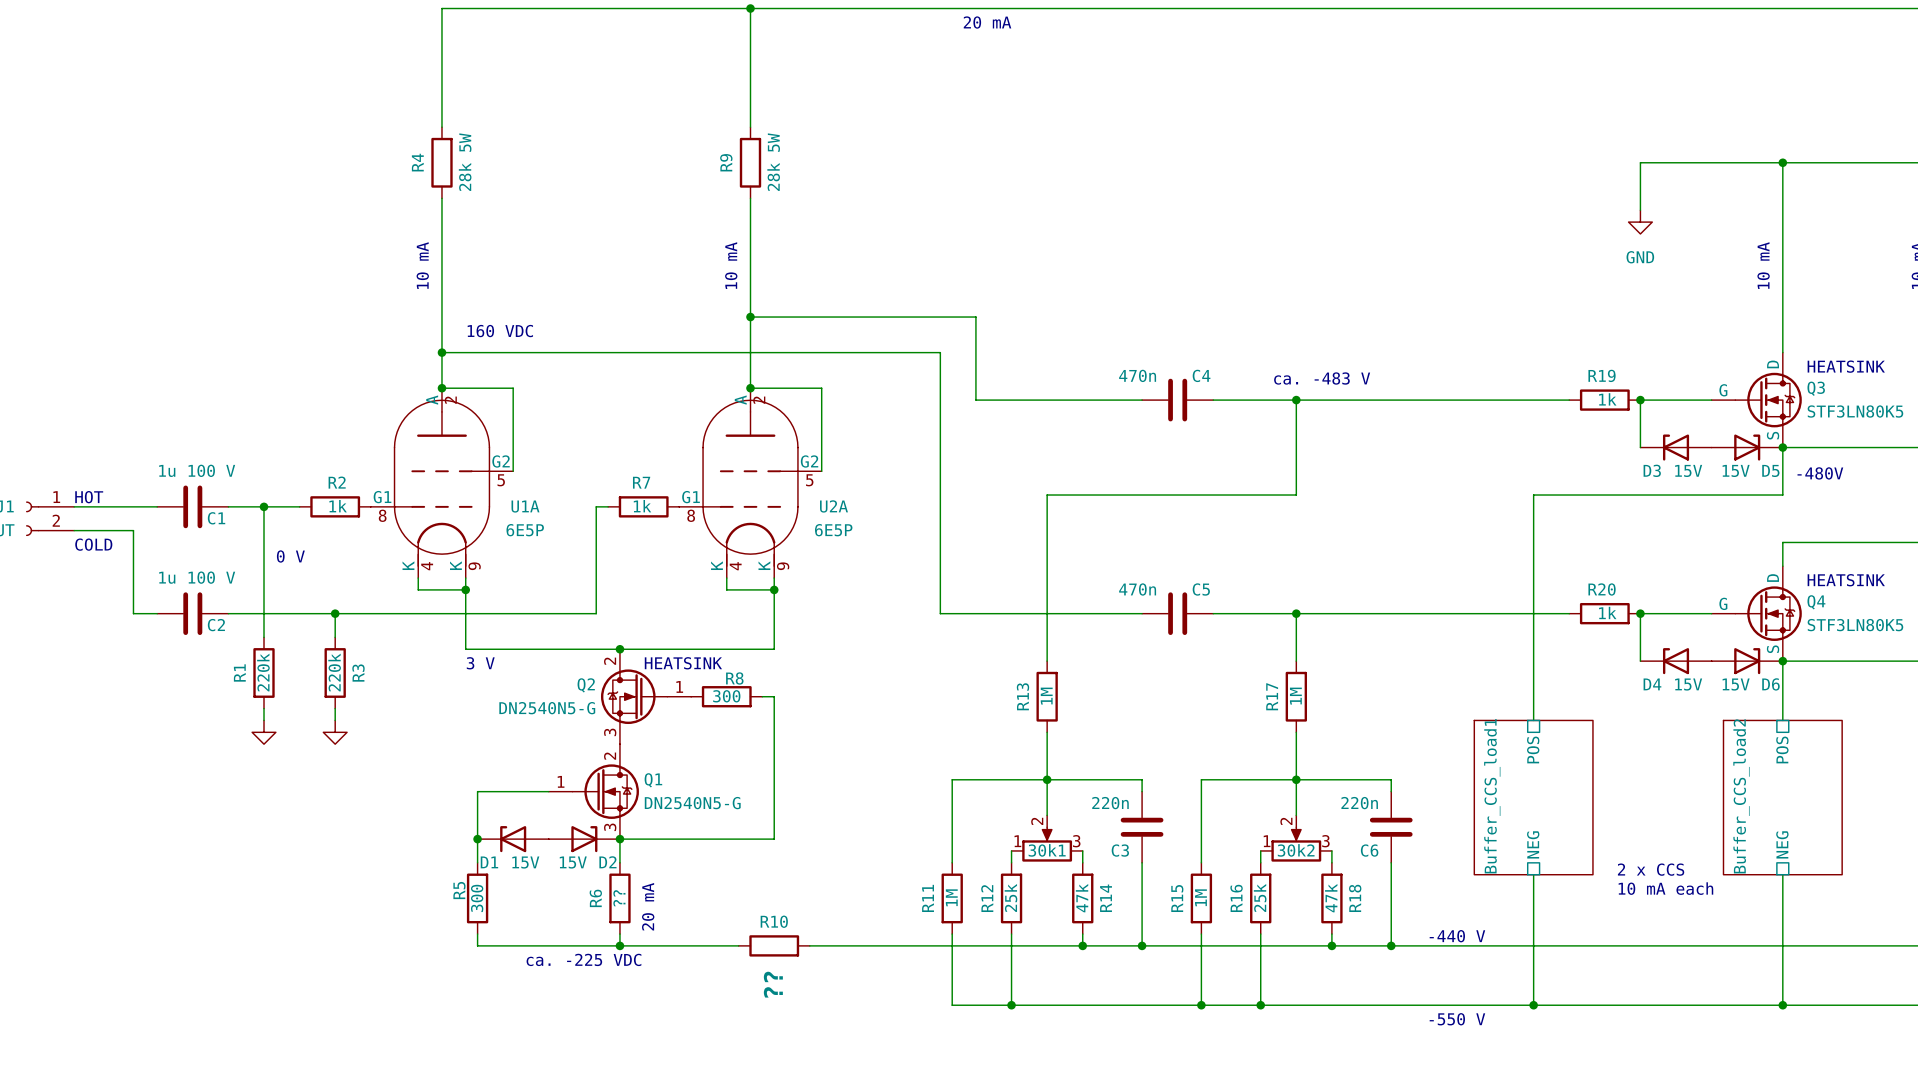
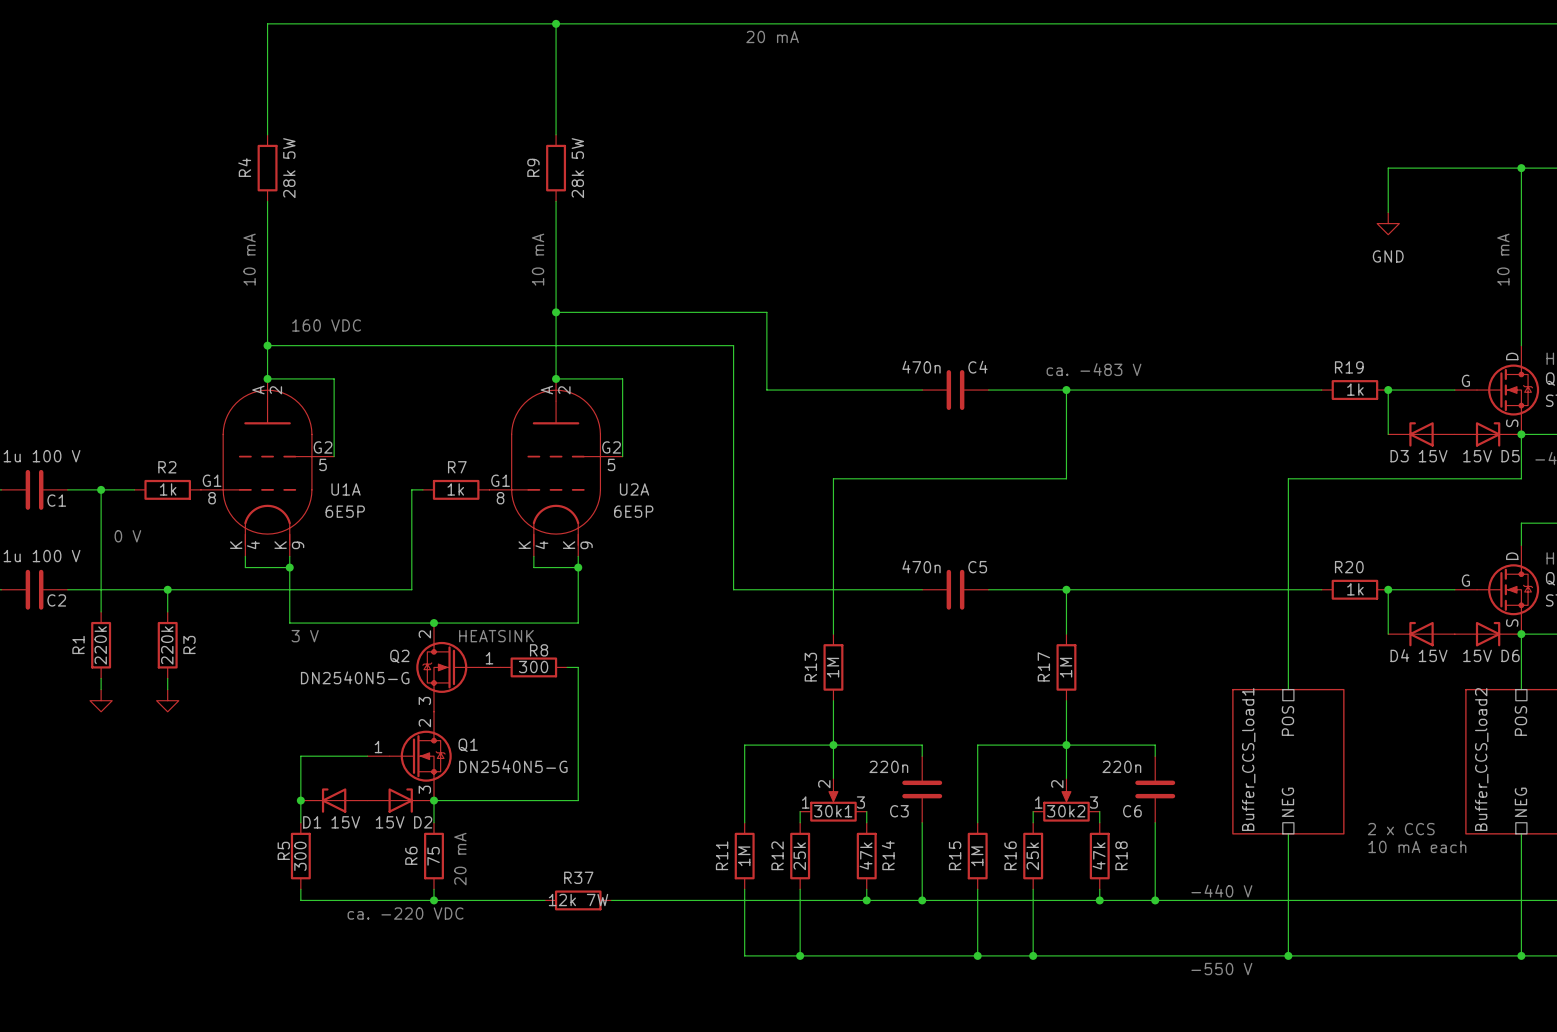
R6 value: ?? (619, 898) -> 75 (433, 856)
R10 name: R10 (774, 921) -> R37 (578, 877)
text: ca. -225 VDC (583, 959) -> ca. -220 VDC (405, 913)
R10 value: ?? (773, 984) -> 12k 7W (578, 900)

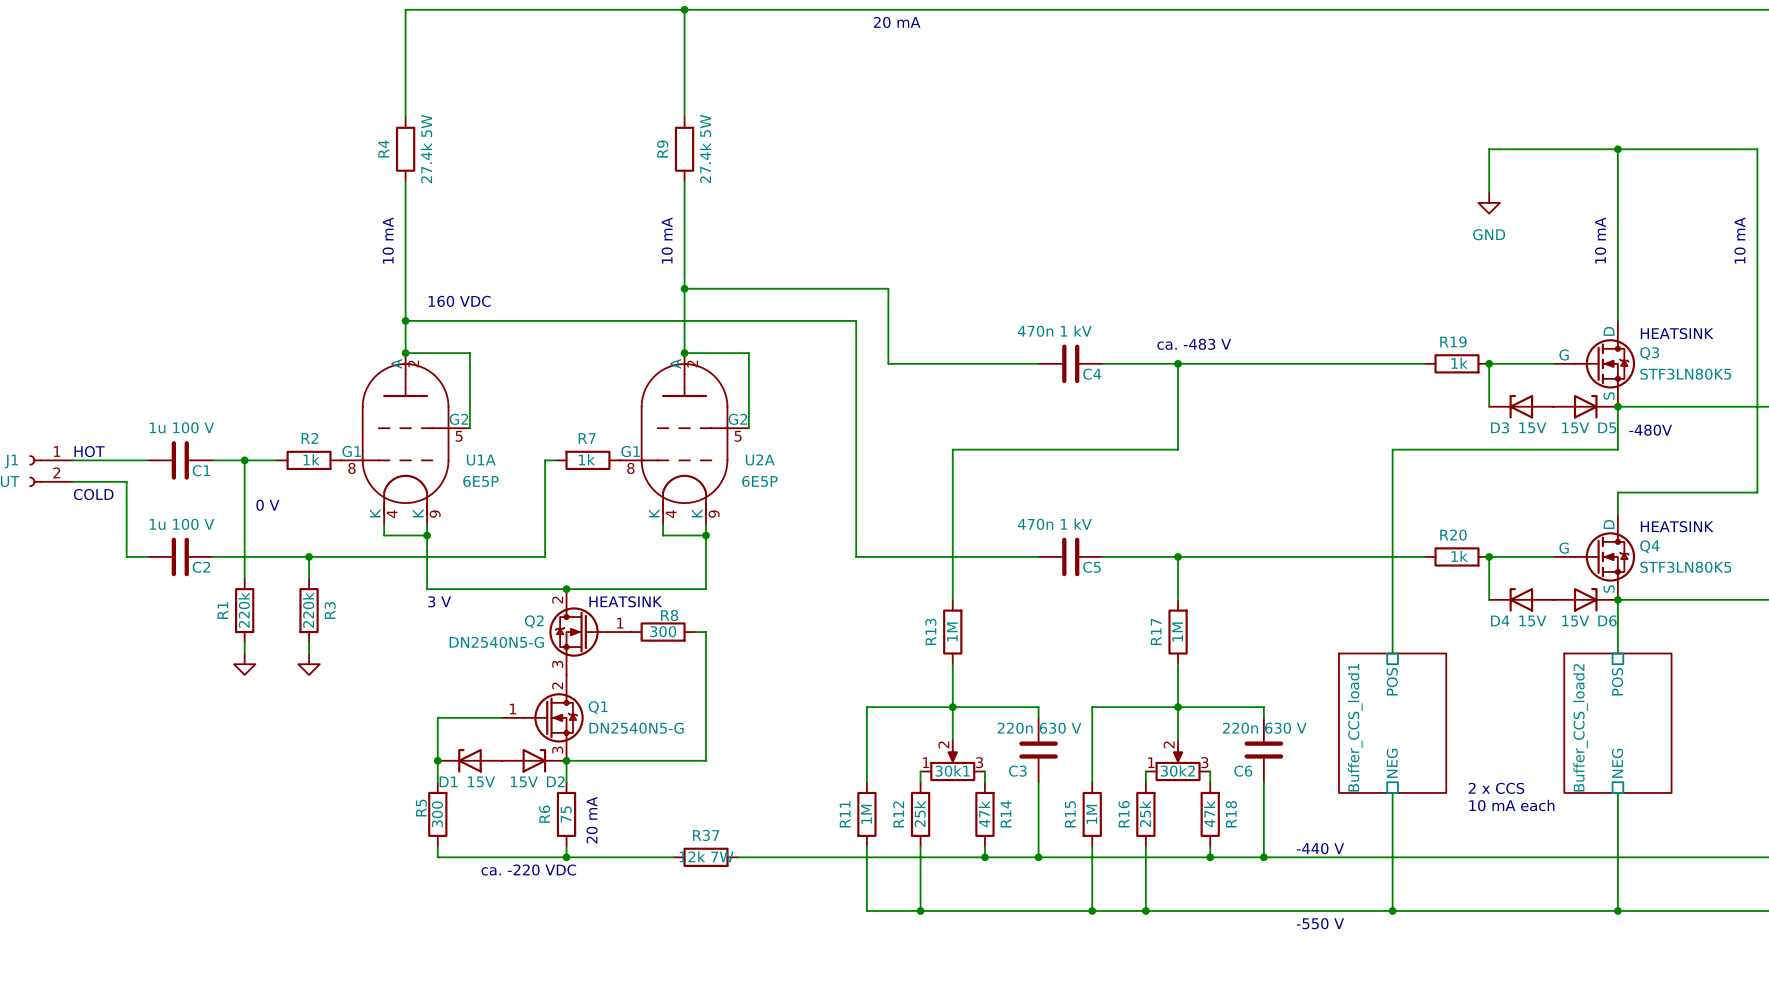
R4 value: 28k 5W (289, 168) -> 27.4k 5W (426, 148)
R9 value: 28k 5W (577, 168) -> 27.4k 5W (705, 148)
C4 value: 470n (921, 367) -> 470n 1 kV (1054, 331)
C4 name position: C4 (977, 367) -> C4 (1092, 374)
C5 value: 470n (921, 566) -> 470n 1 kV (1054, 524)
C5 name position: C5 (977, 567) -> C5 (1092, 567)
C3 value: 220n (888, 766) -> 220n 630 V (1039, 728)
C6 value: 220n (1121, 766) -> 220n 630 V (1264, 728)

